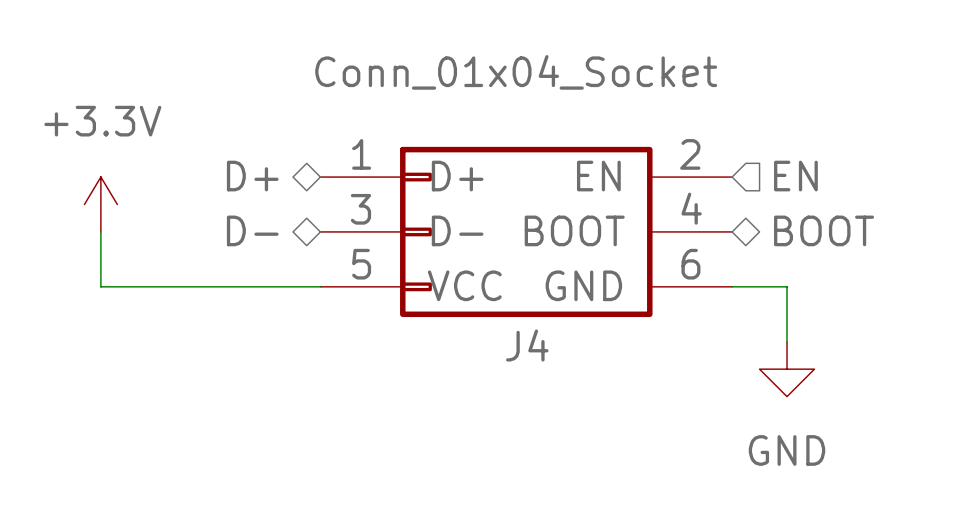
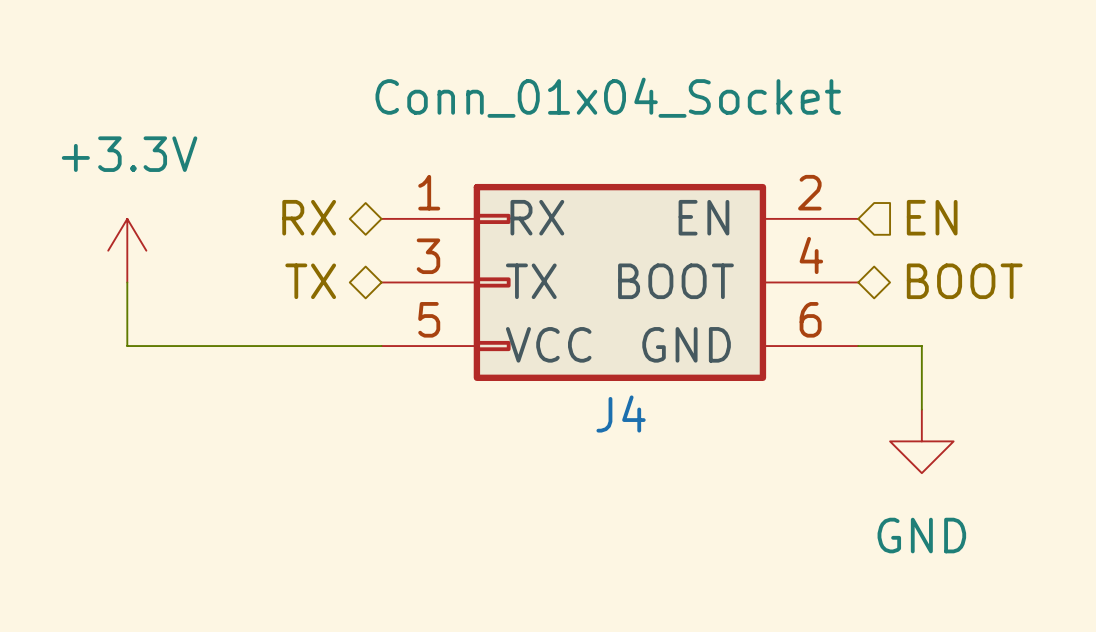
hierarchical label: D+ (252, 176) -> RX (309, 217)
J4 pin name: D+ (457, 176) -> RX (537, 217)
hierarchical label: D- (252, 230) -> TX (310, 281)
J4 pin name: D- (457, 230) -> TX (531, 281)

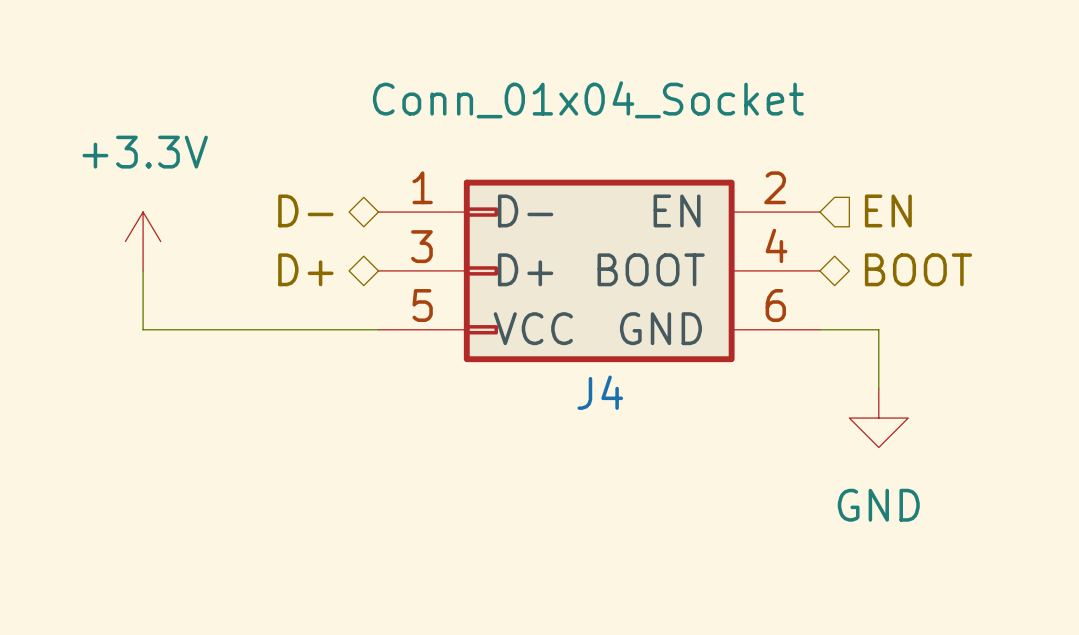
hierarchical label: RX (309, 217) -> D- (305, 210)
J4 pin name: RX (537, 217) -> D- (525, 210)
hierarchical label: TX (310, 281) -> D+ (305, 269)
J4 pin name: TX (531, 281) -> D+ (525, 269)

